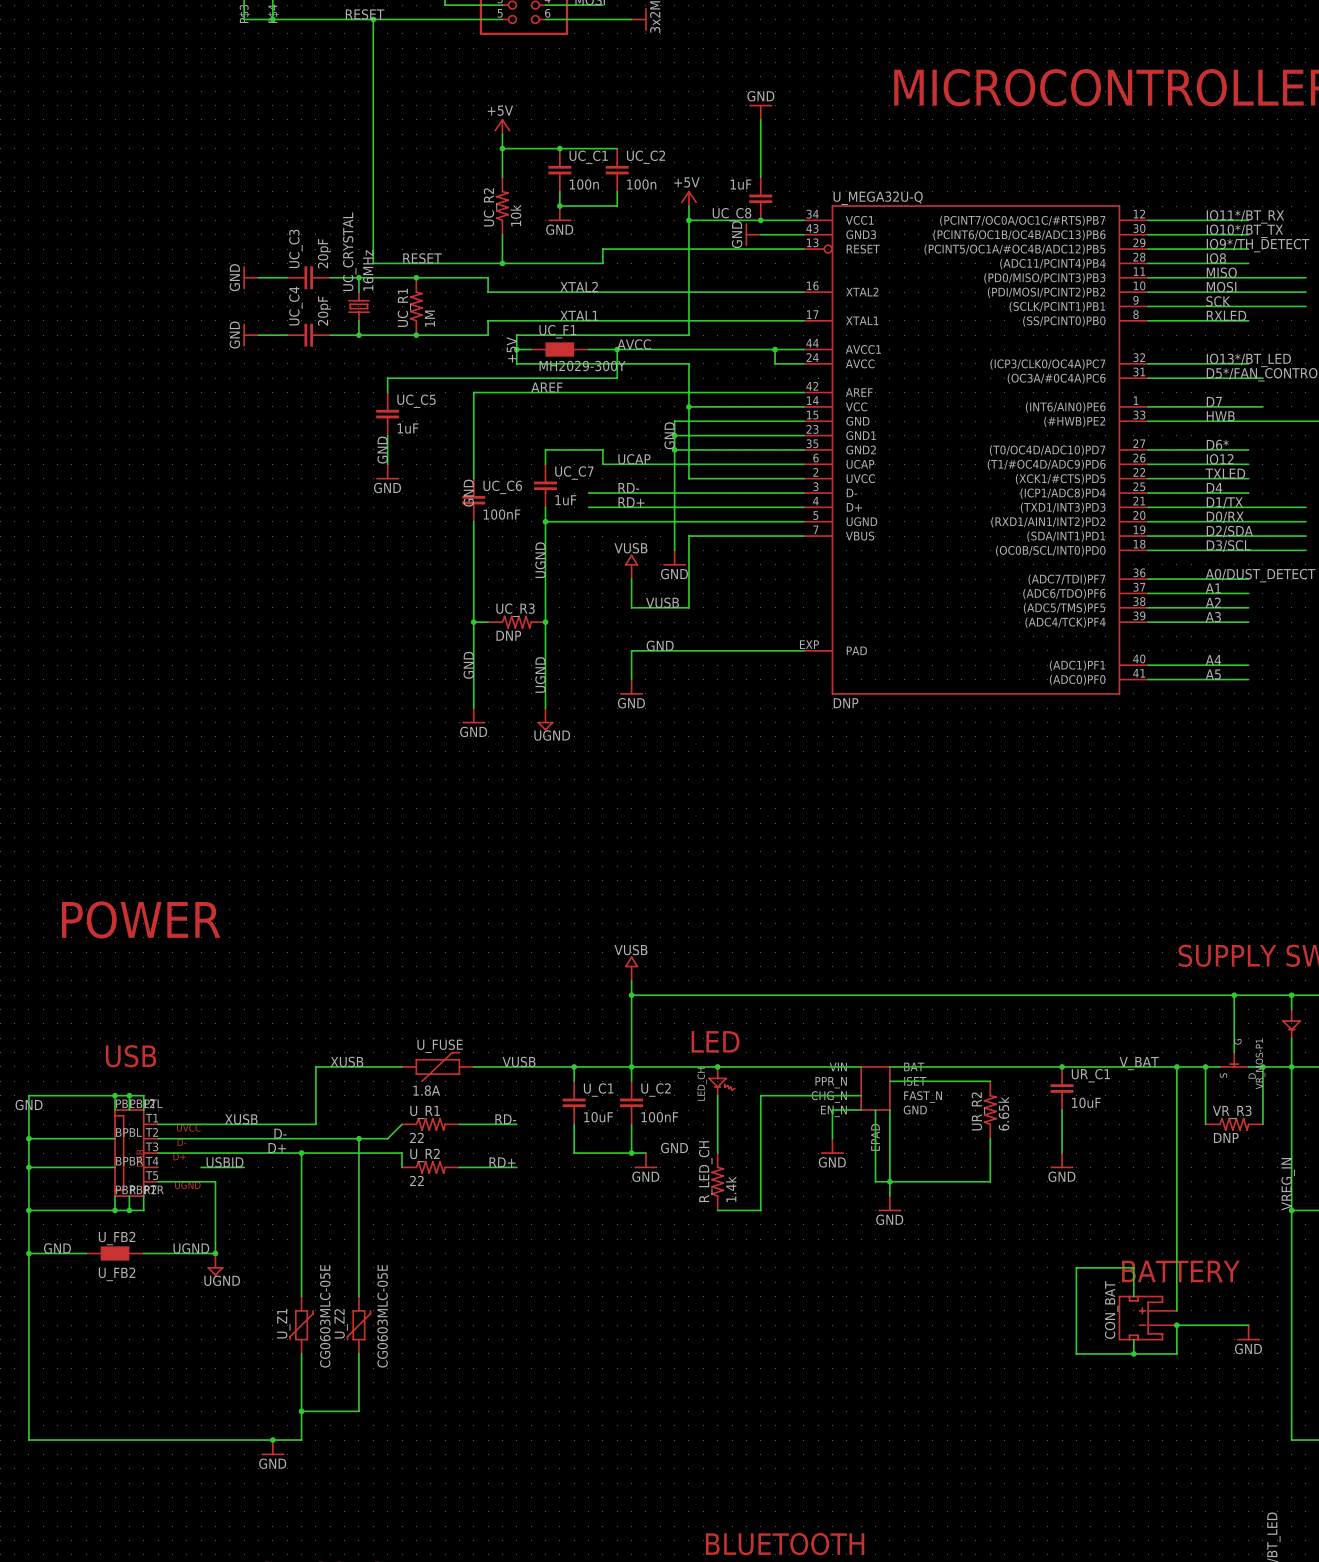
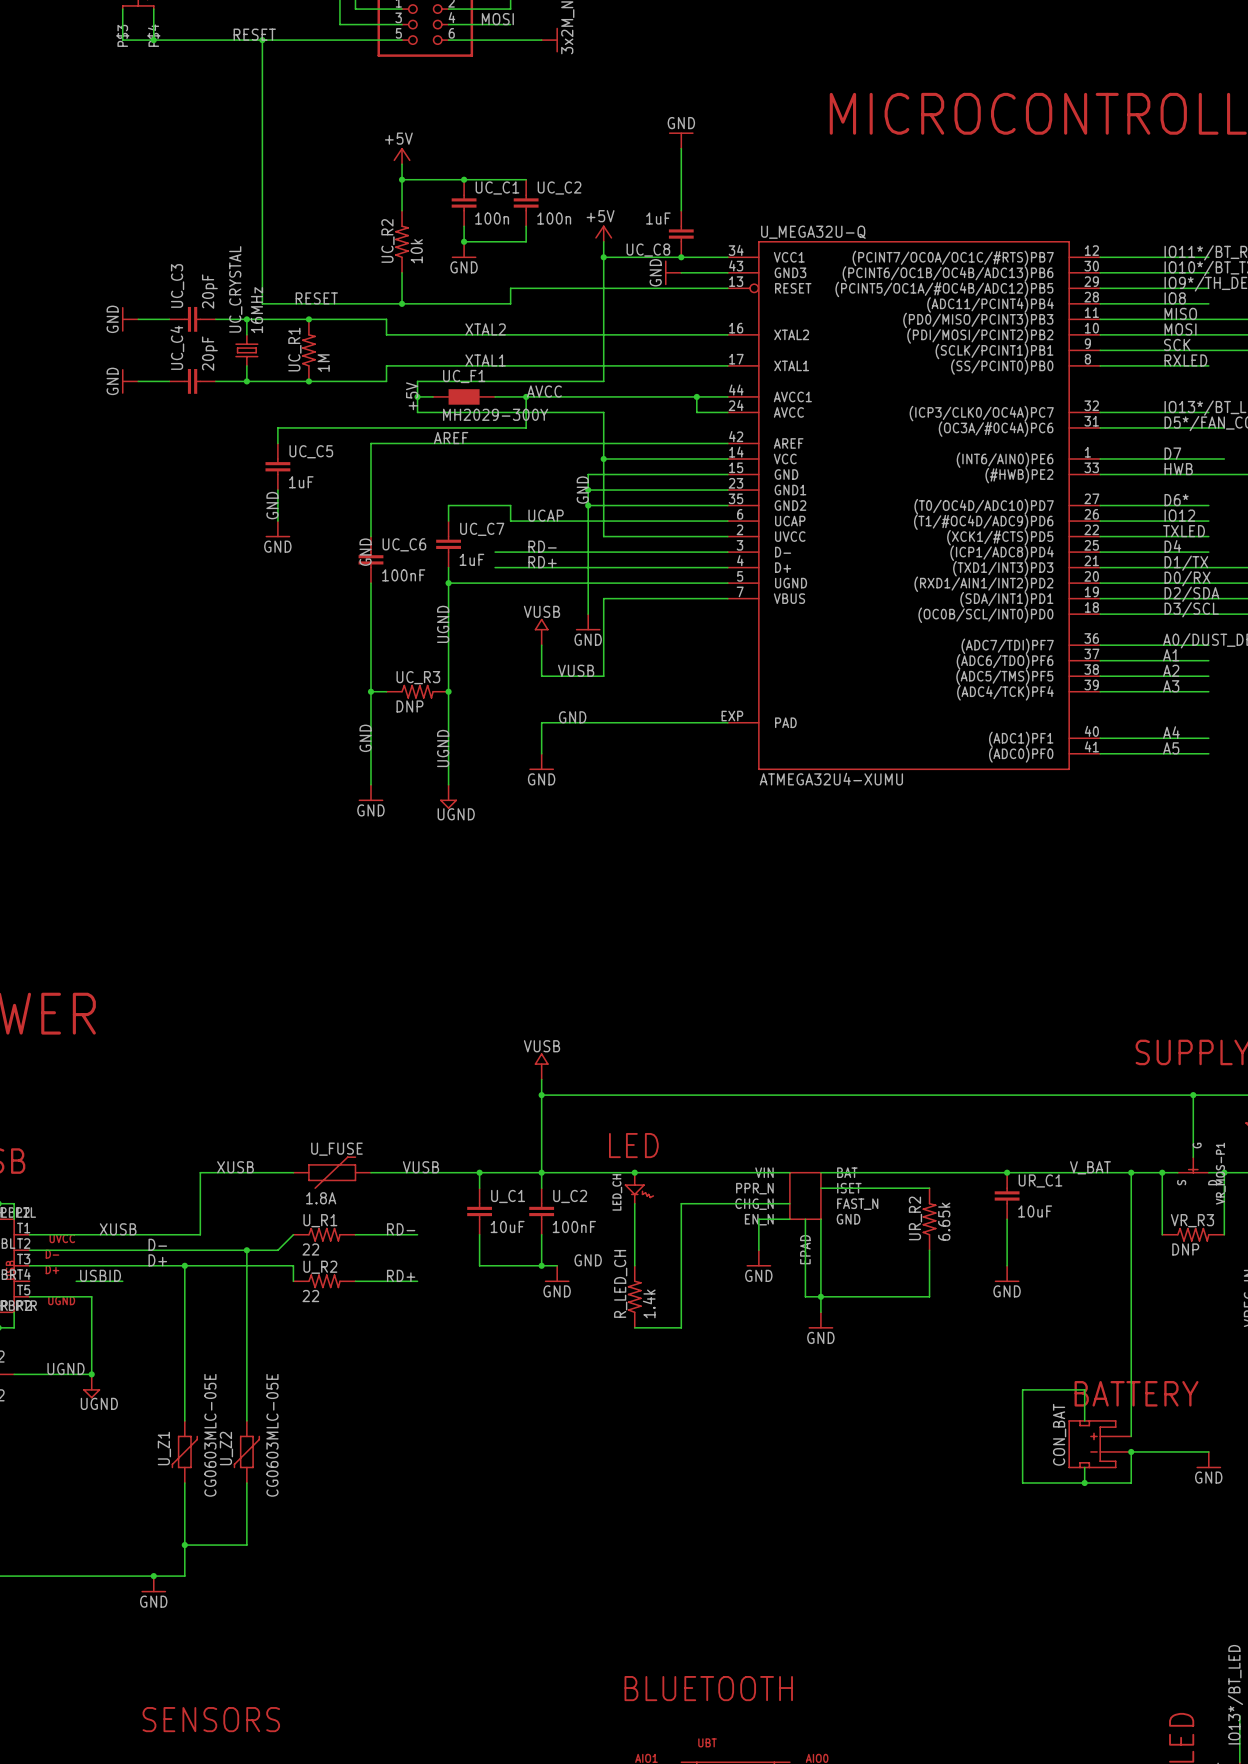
U_MEGA32U-Q value: DNP (846, 703) -> ATMEGA32U4-XUMU (831, 779)

